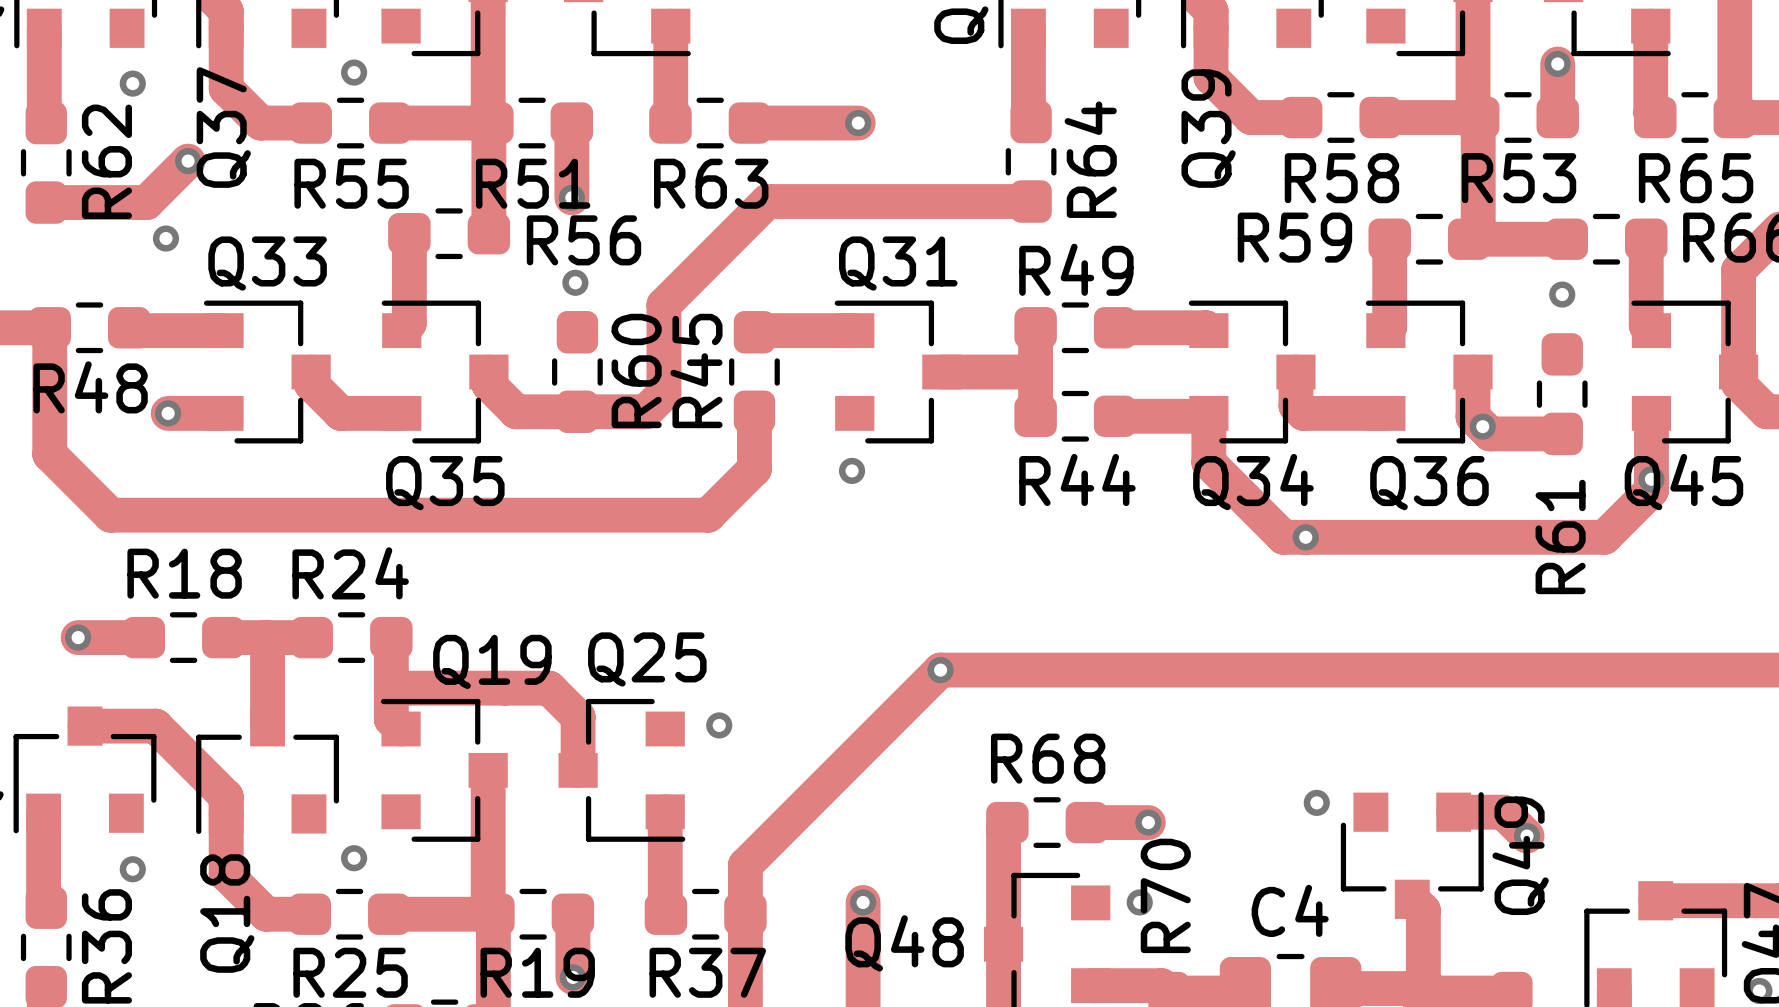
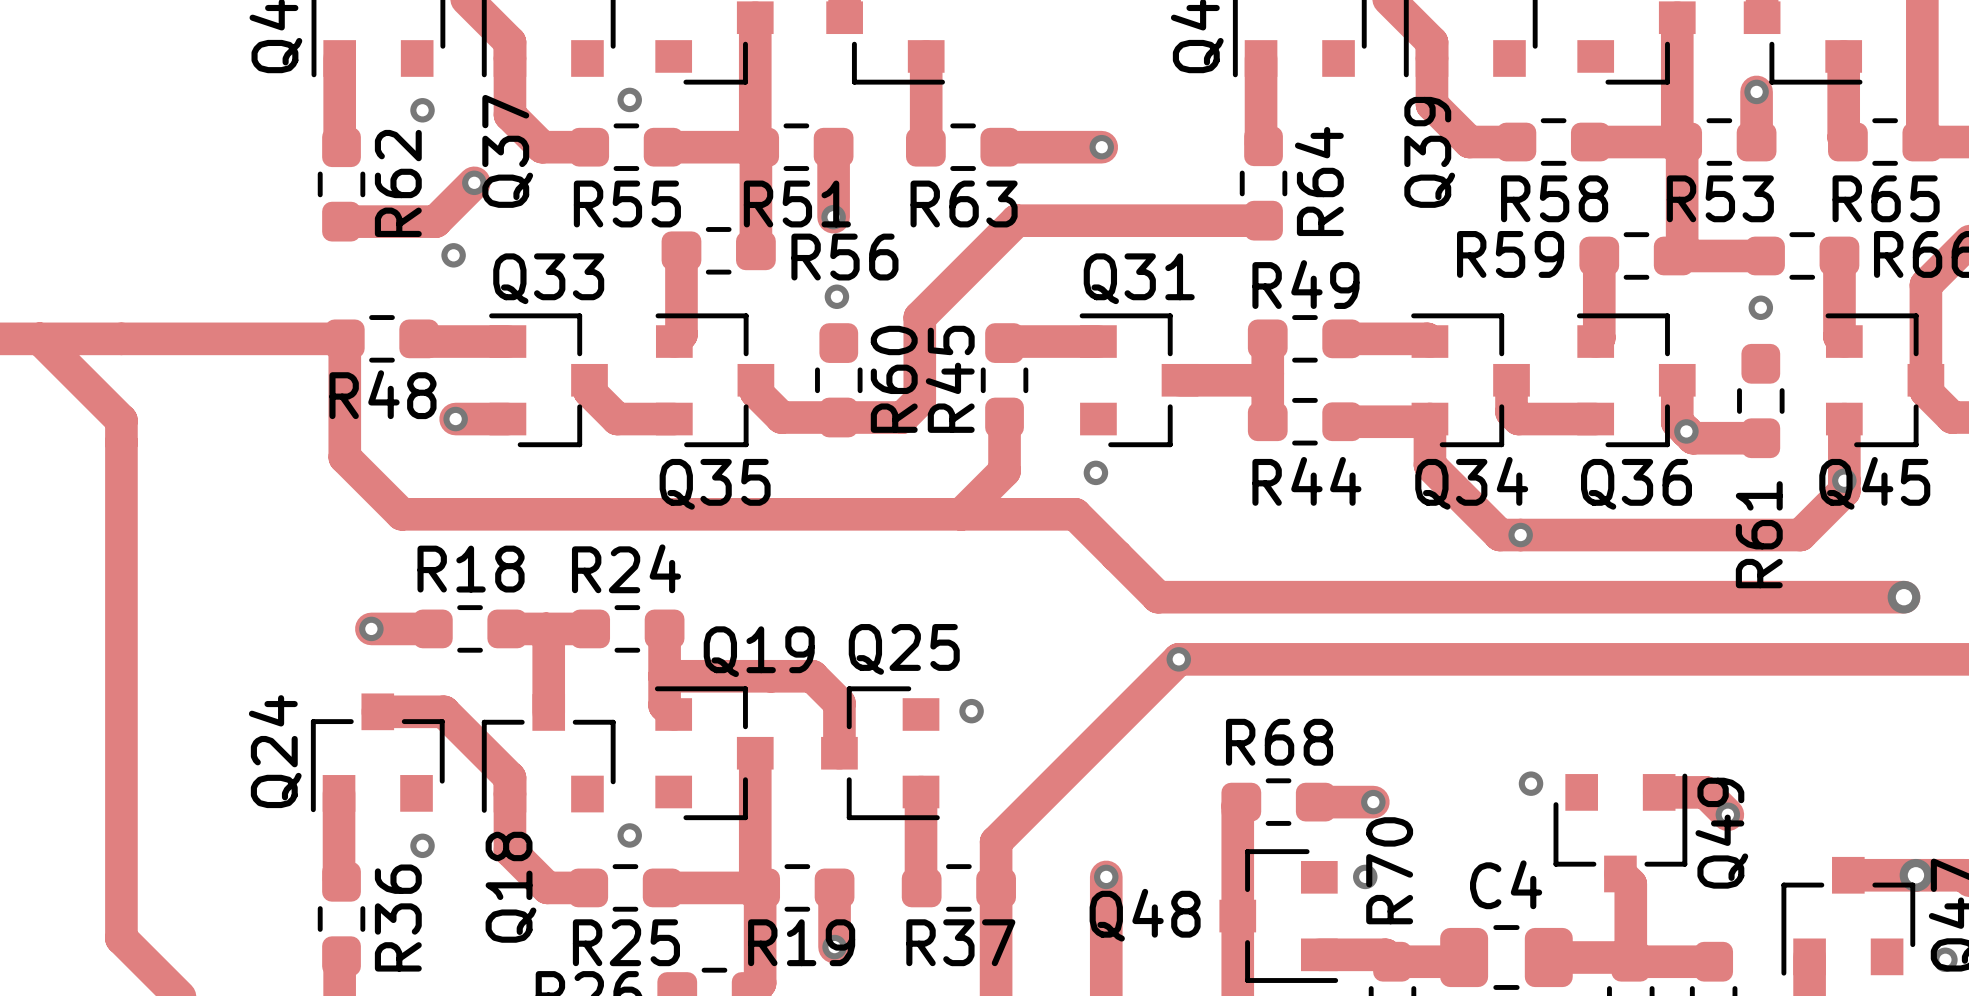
track: none -> (961, 514) (1075, 514) (1158, 597) (1903, 597)
via: none -> (1903, 597)
via: none -> (1915, 875)

